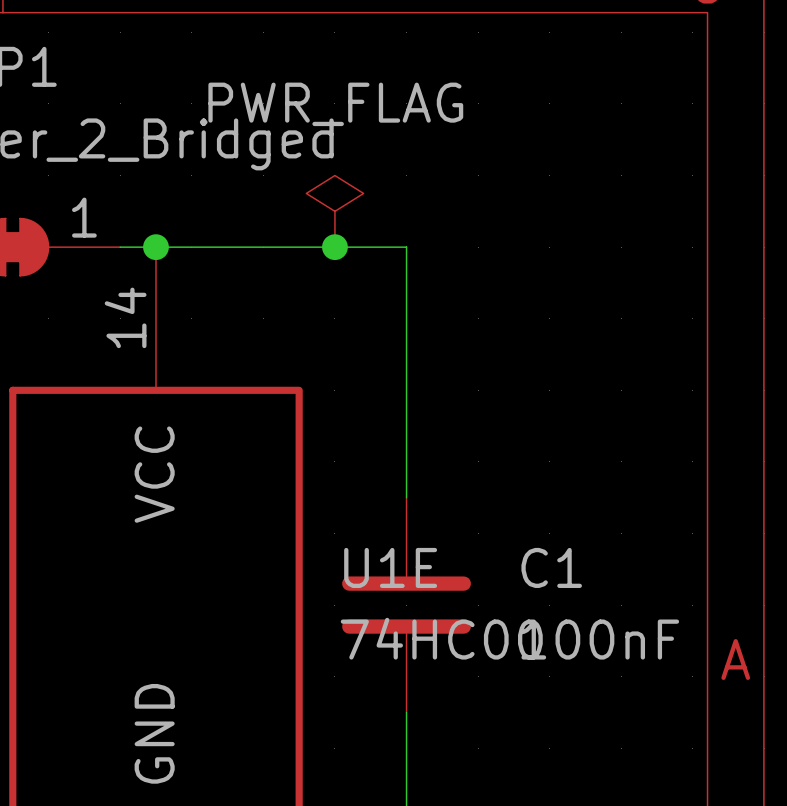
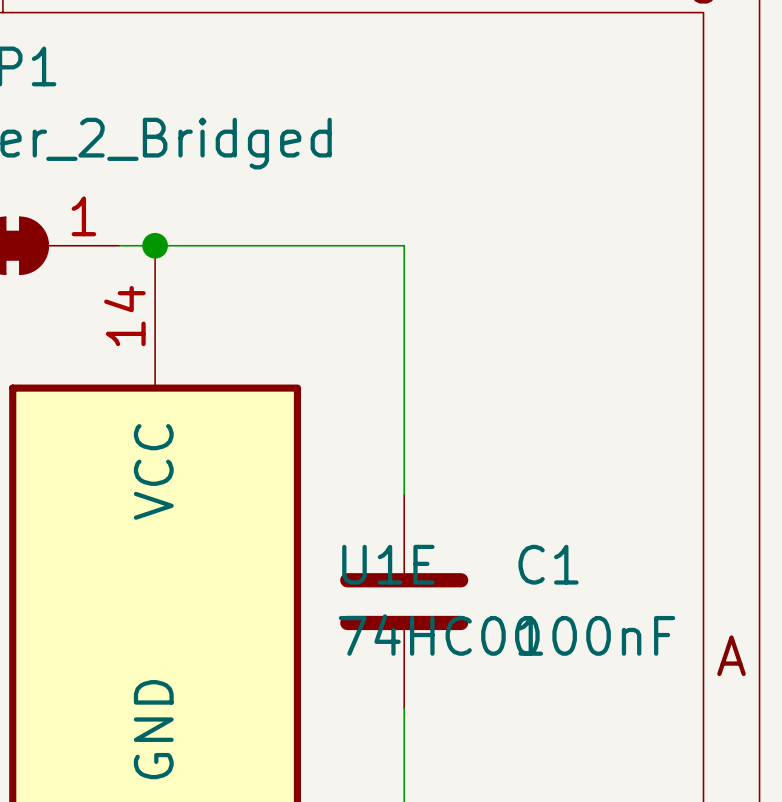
power symbol: PWR_FLAG (334, 211) -> none
junction: (334, 247) -> none

